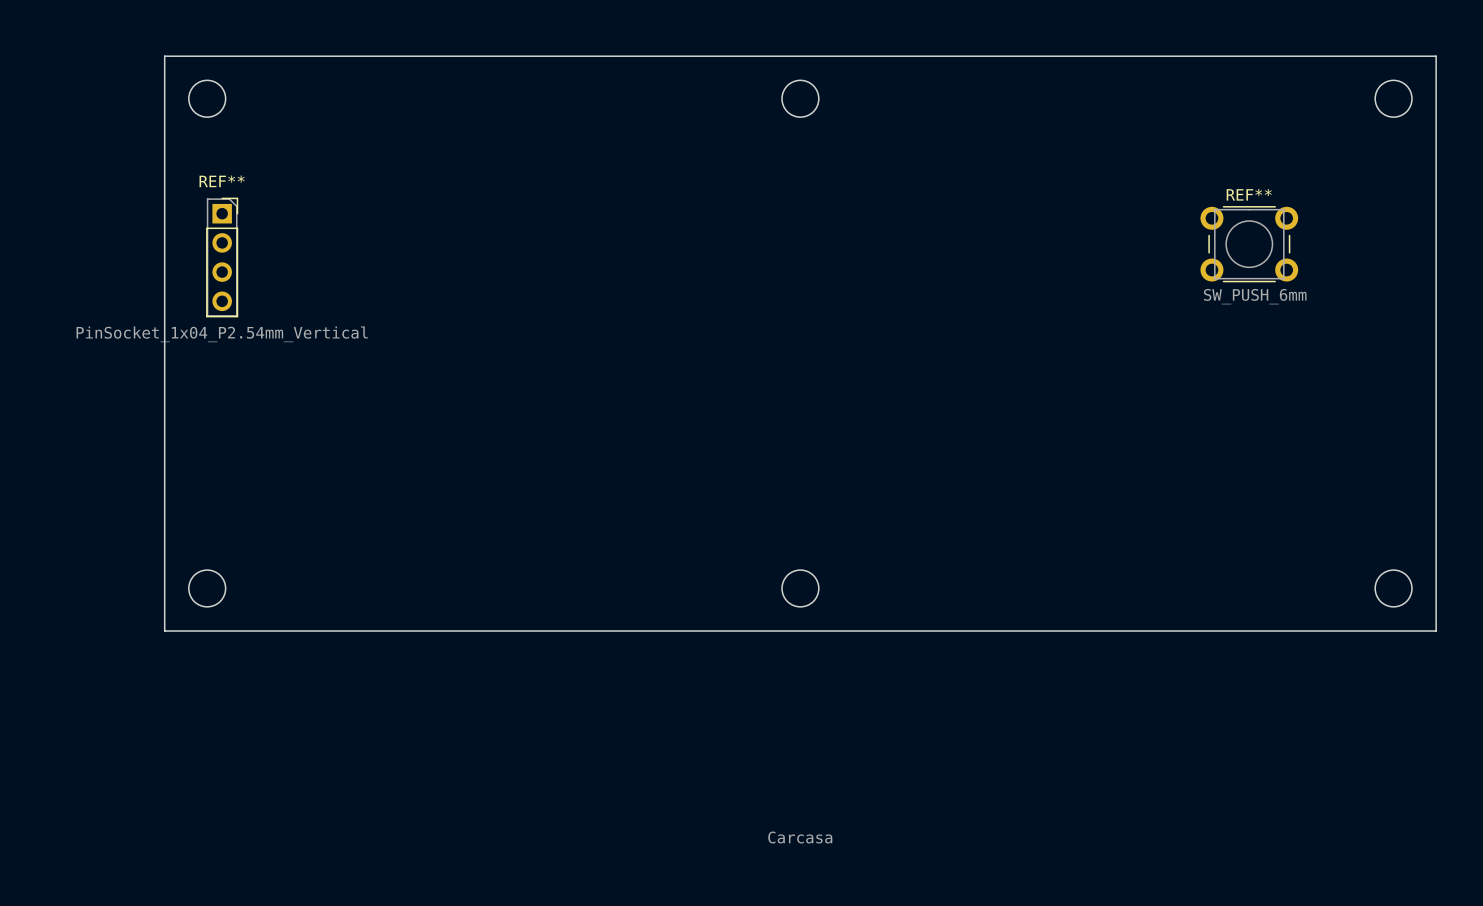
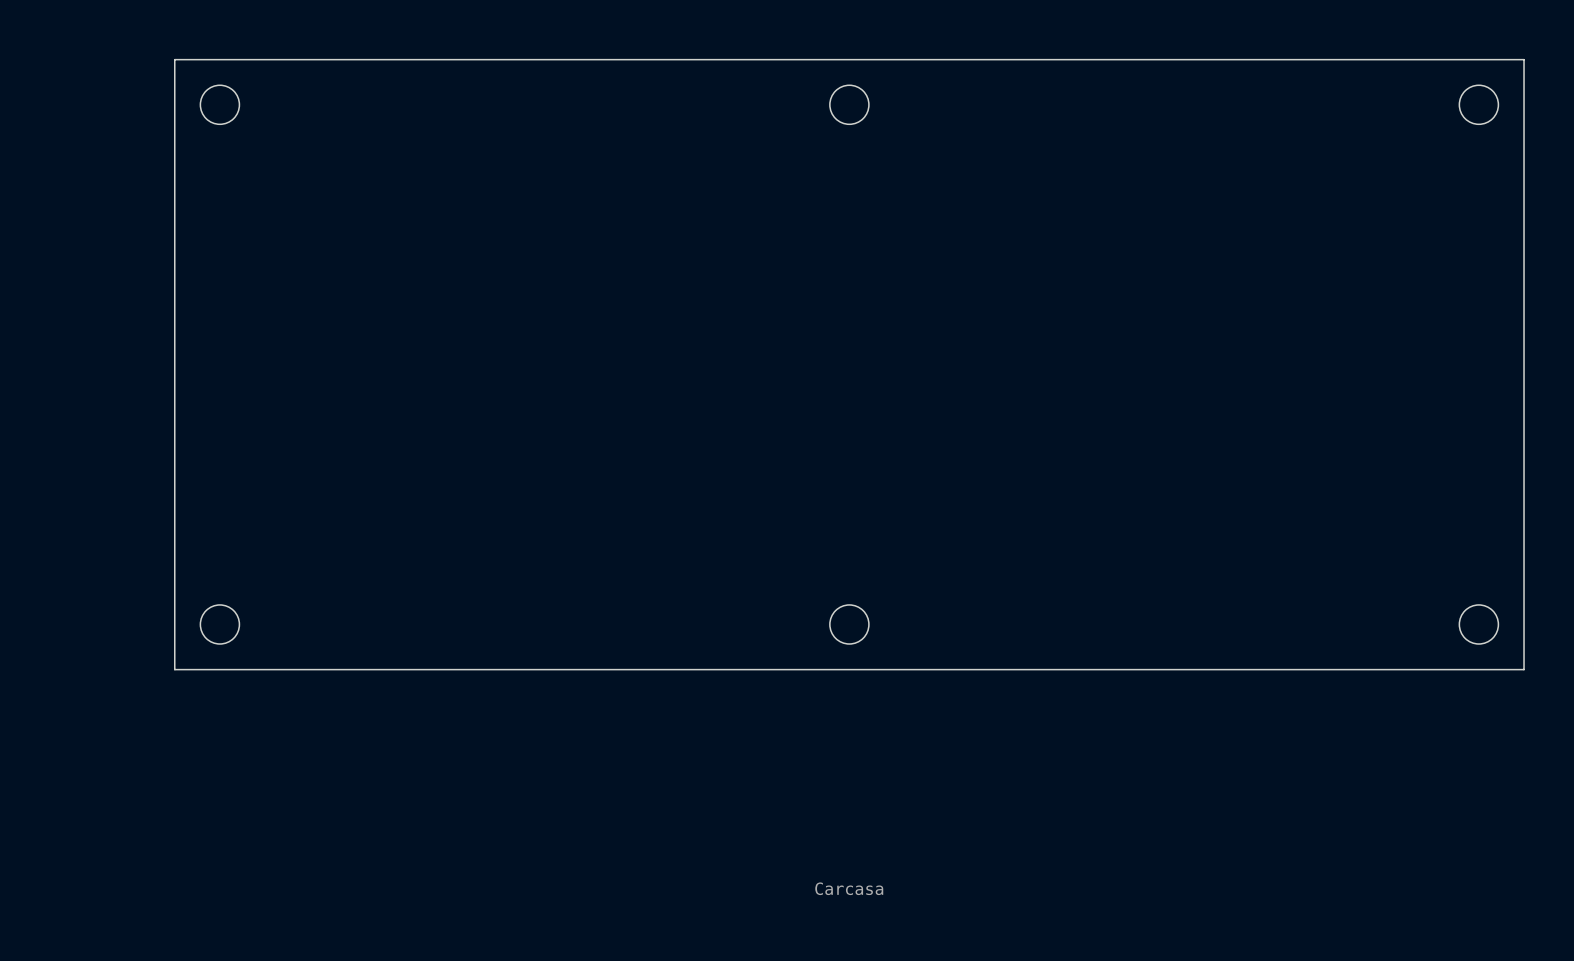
REF**: SW_PUSH_6mm (1249, 244) -> none
REF**: PinSocket_1x04_P2.54mm_Vertical (222, 257) -> none

